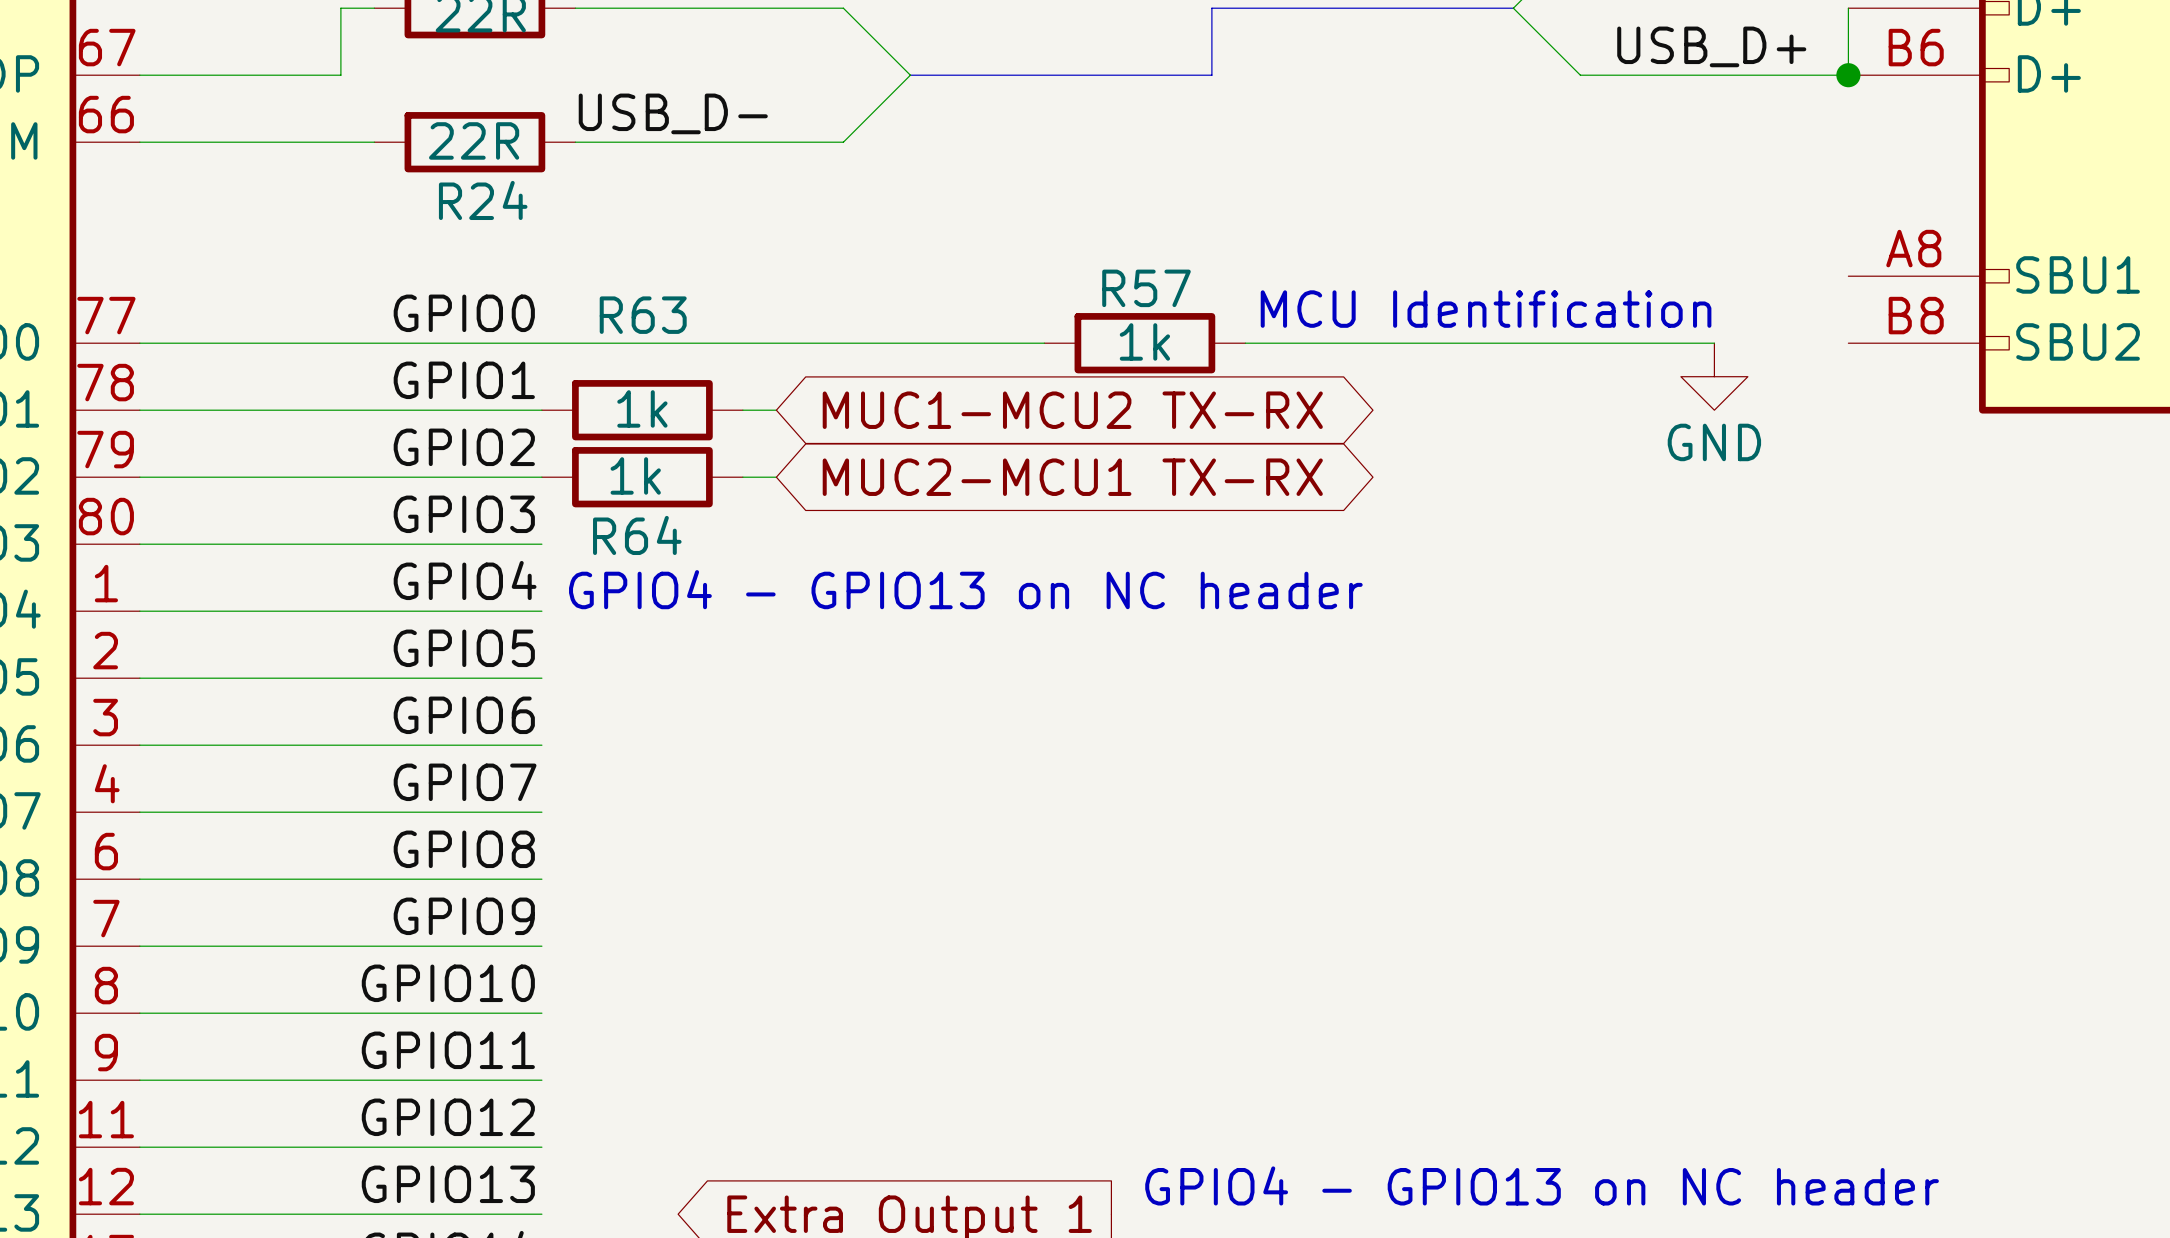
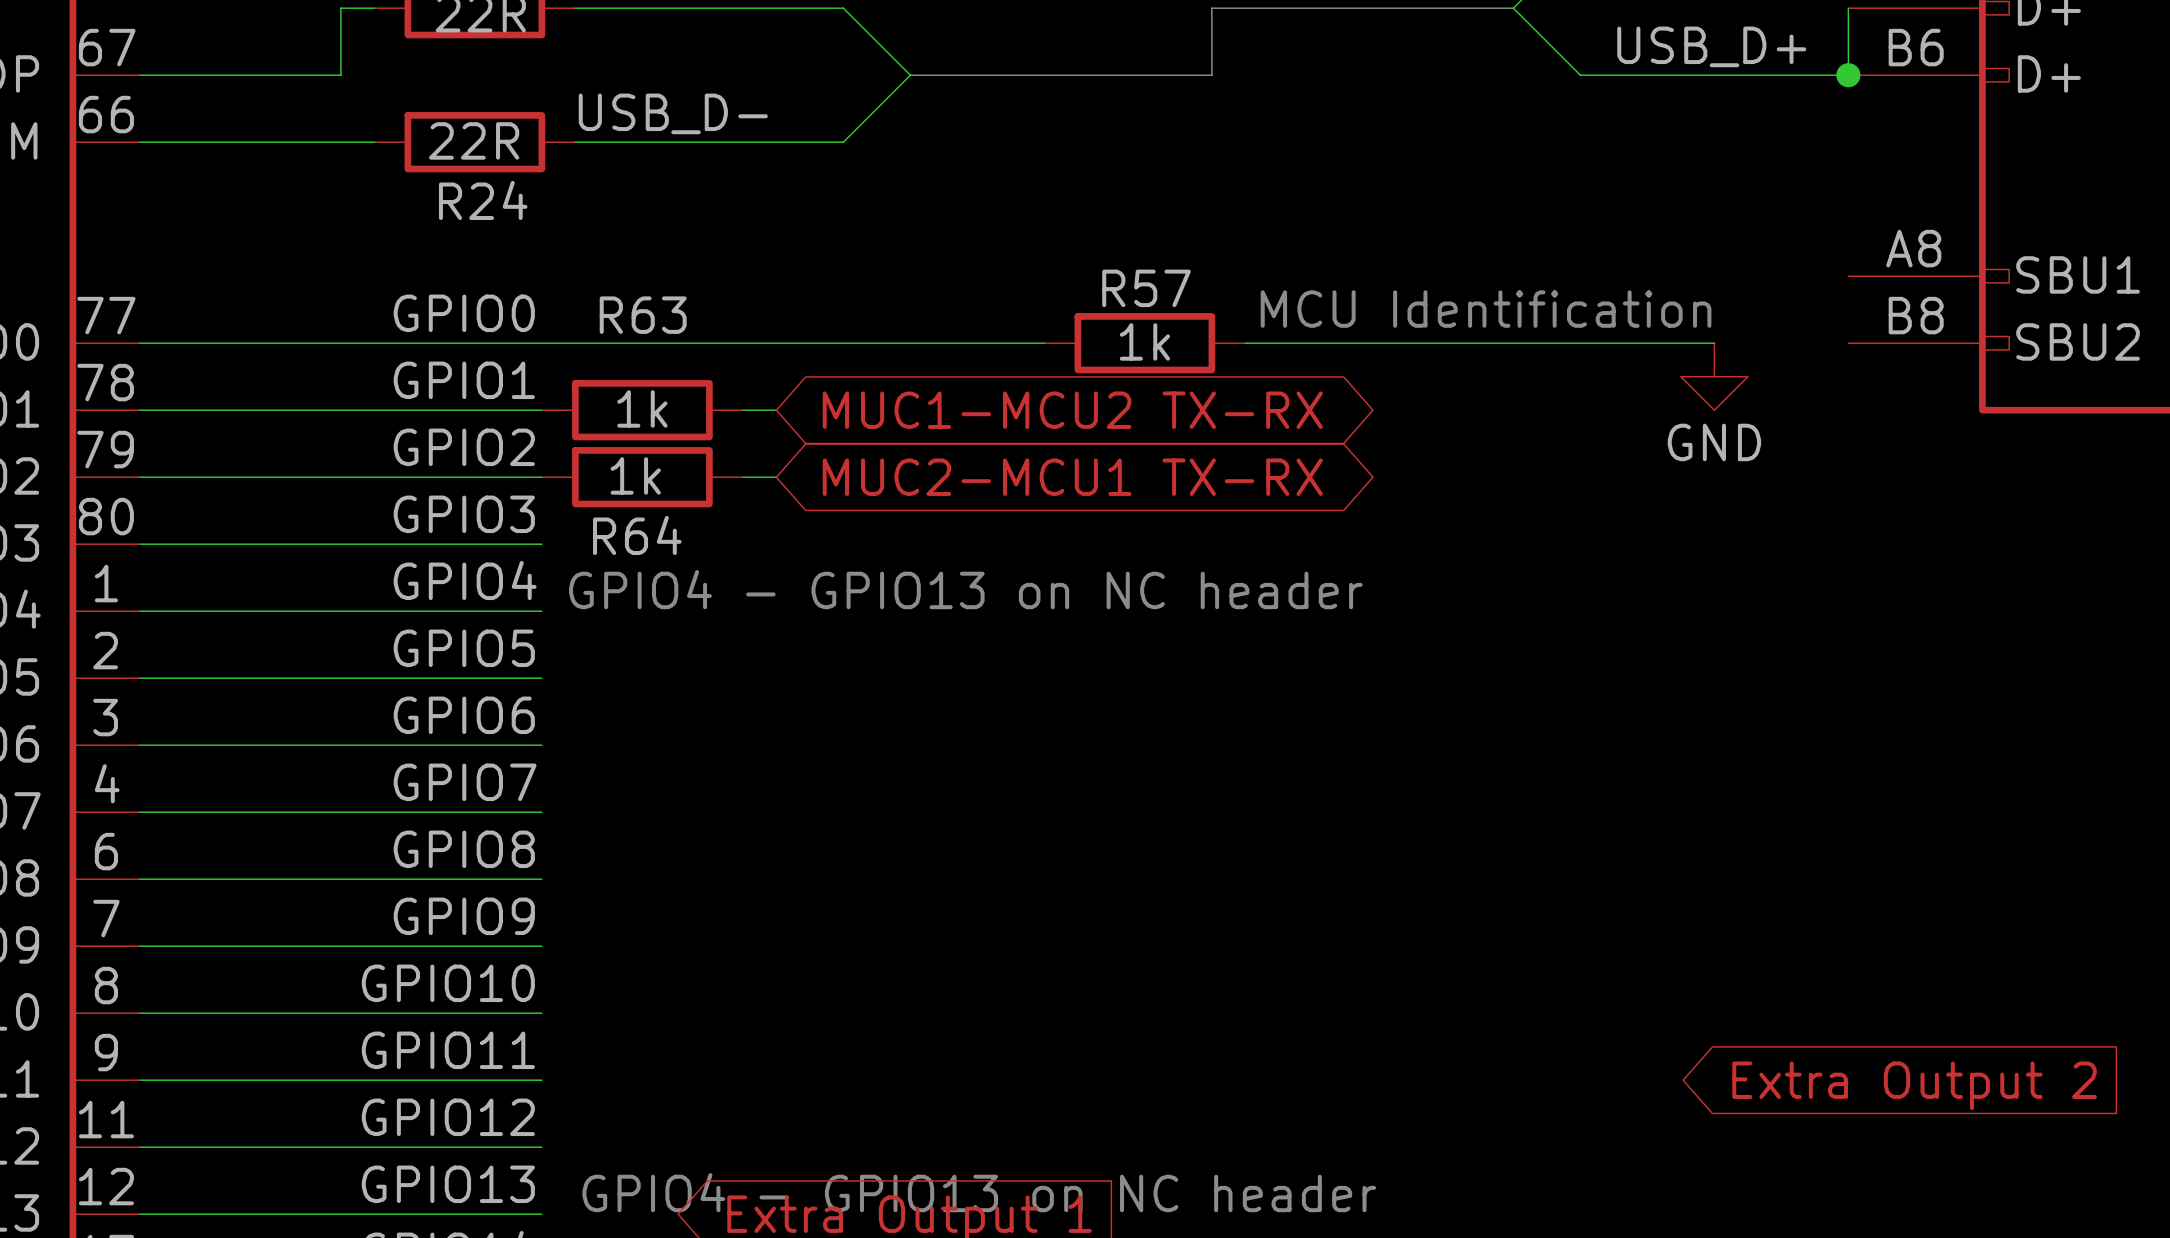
global label: none -> Extra Output 2 (1914, 1085)
text position: GPIO4 - GPIO13 on NC header (1542, 1185) -> GPIO4 - GPIO13 on NC header (979, 1192)

